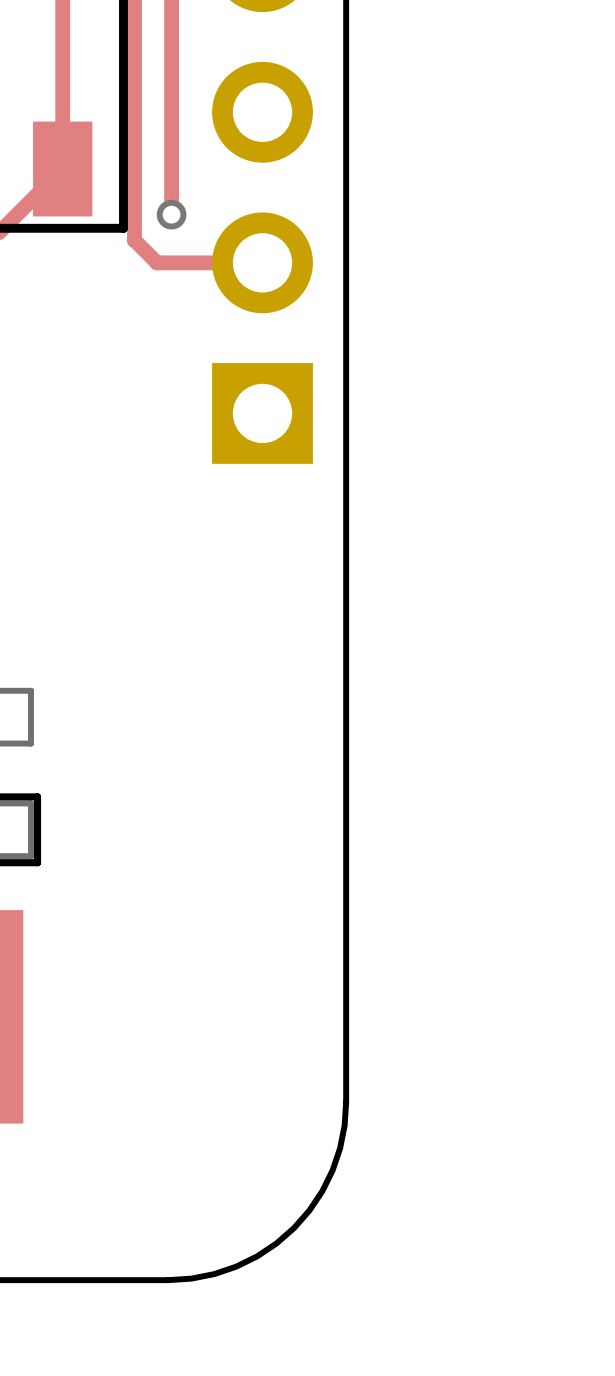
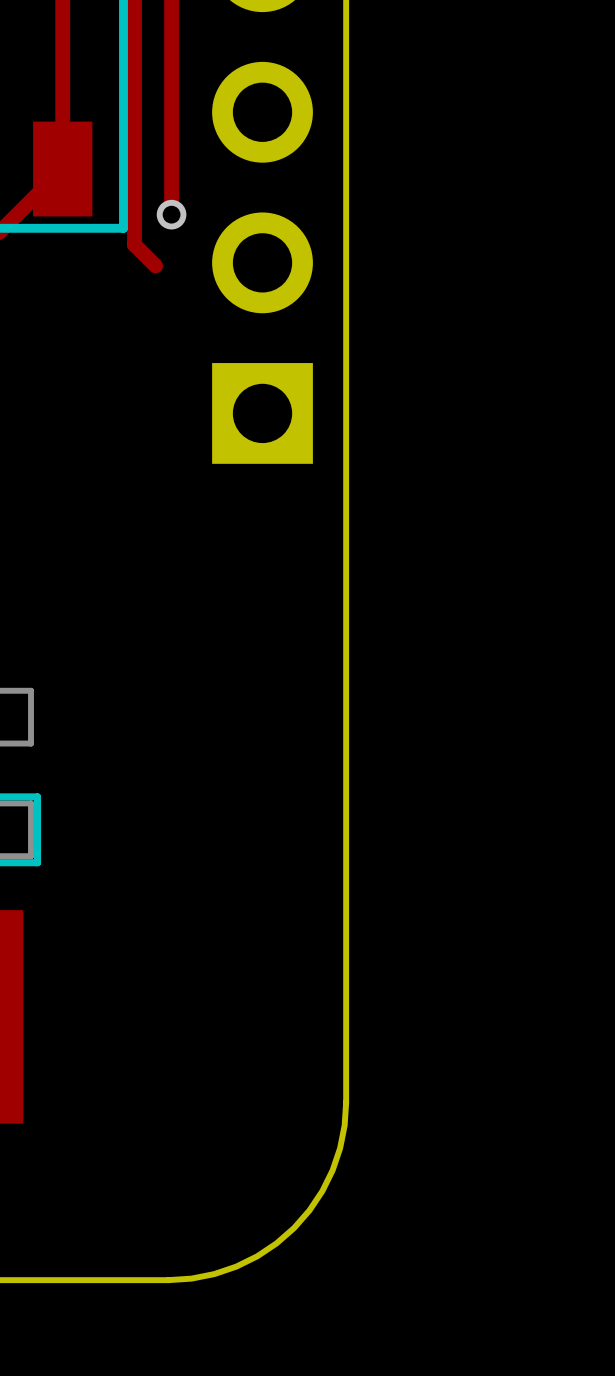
track: (134, 240) (157, 262) (262, 262) -> (134, 240) (134, 244) (155, 265)

